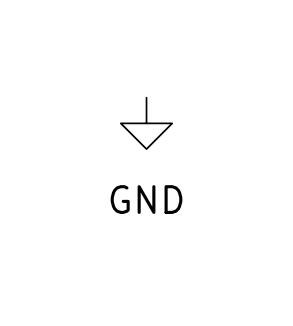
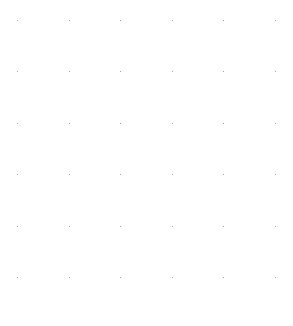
power symbol: GND (146, 123) -> none

